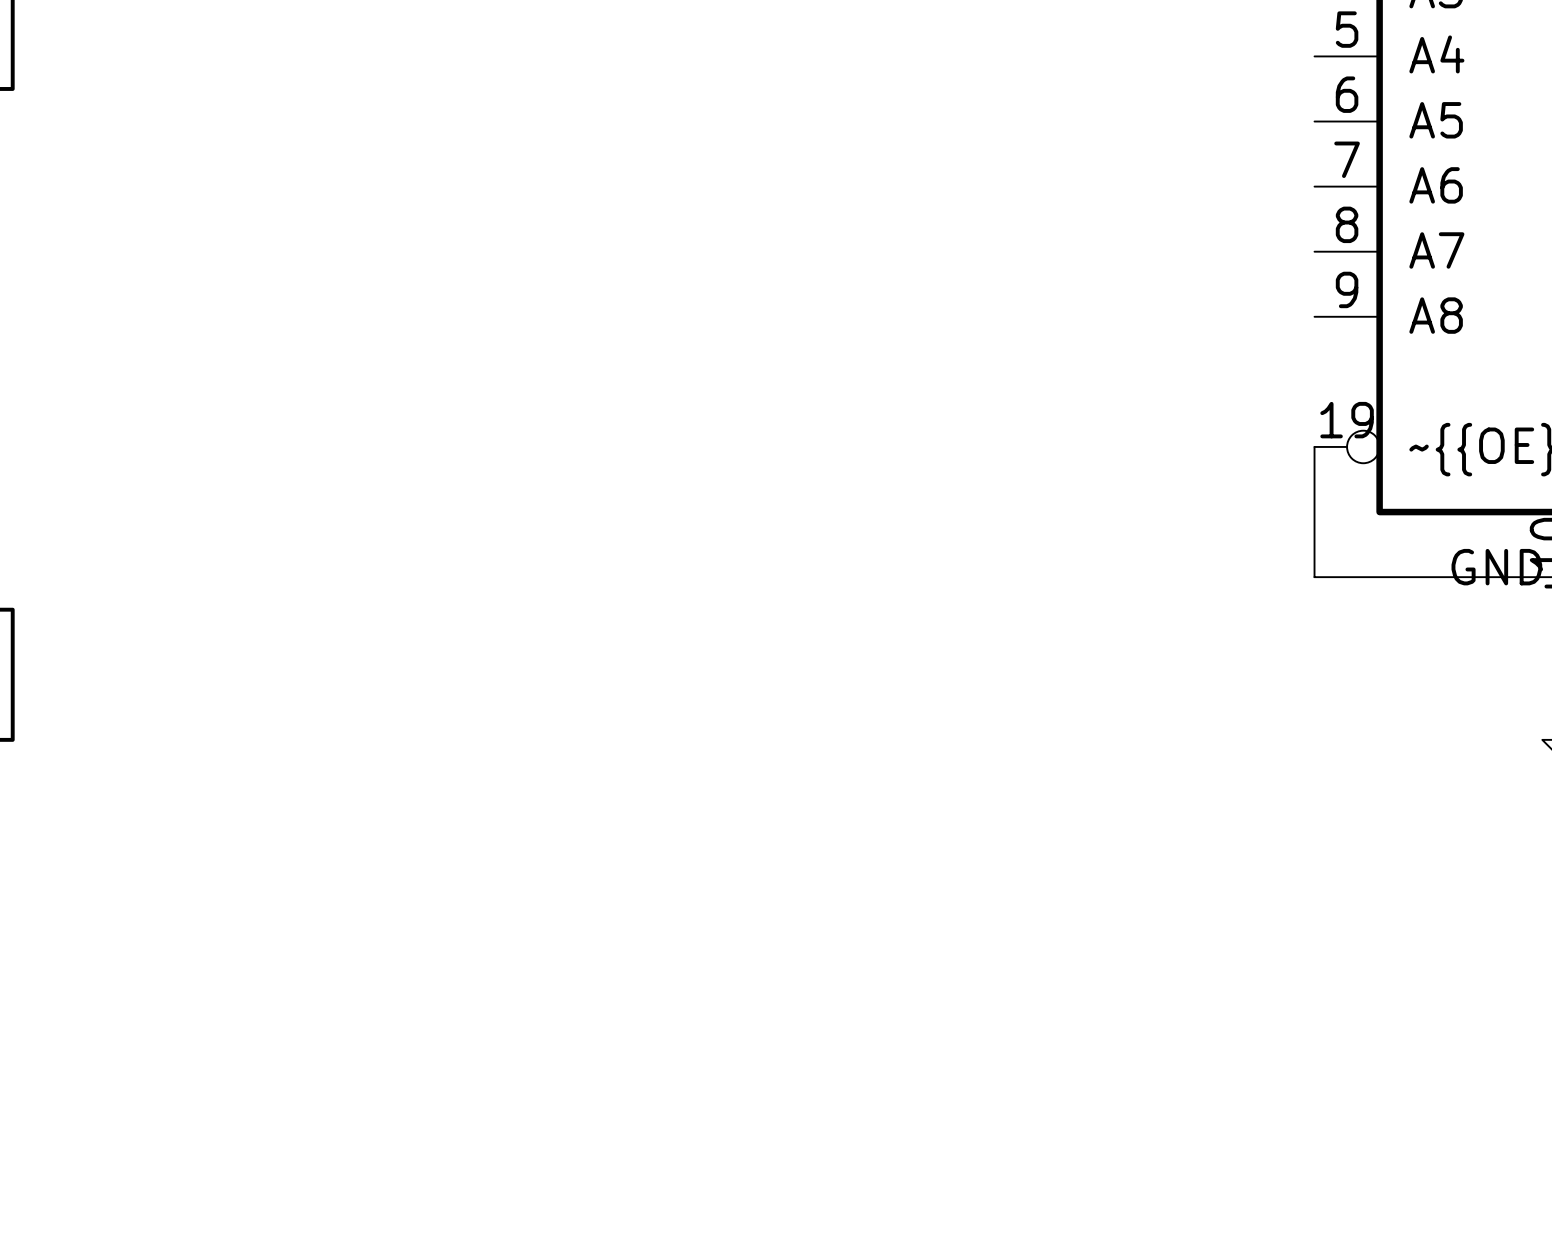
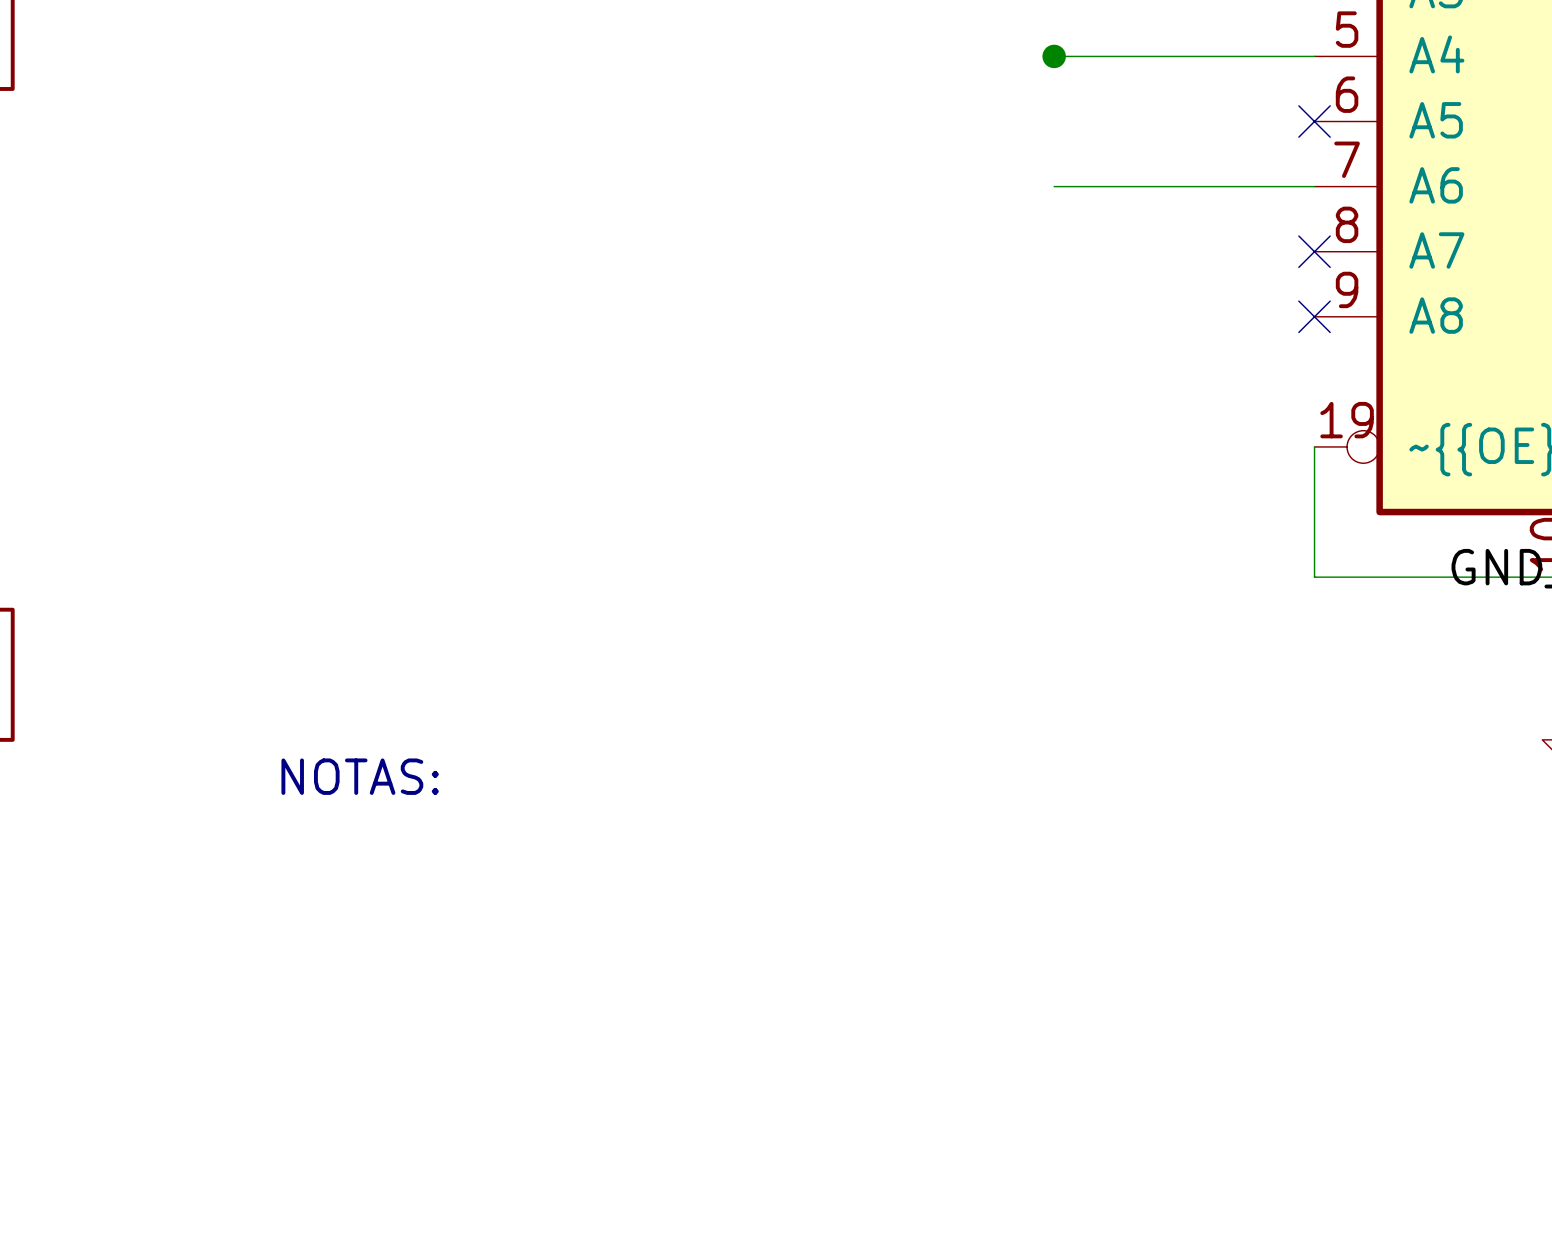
wire: none -> (1054, 56) (1314, 56)
junction: none -> (1054, 56)
no-connect mark: none -> (1314, 121)
wire: none -> (1054, 186) (1314, 186)
no-connect mark: none -> (1314, 251)
no-connect mark: none -> (1314, 316)
text: none -> NOTAS: (360, 776)

